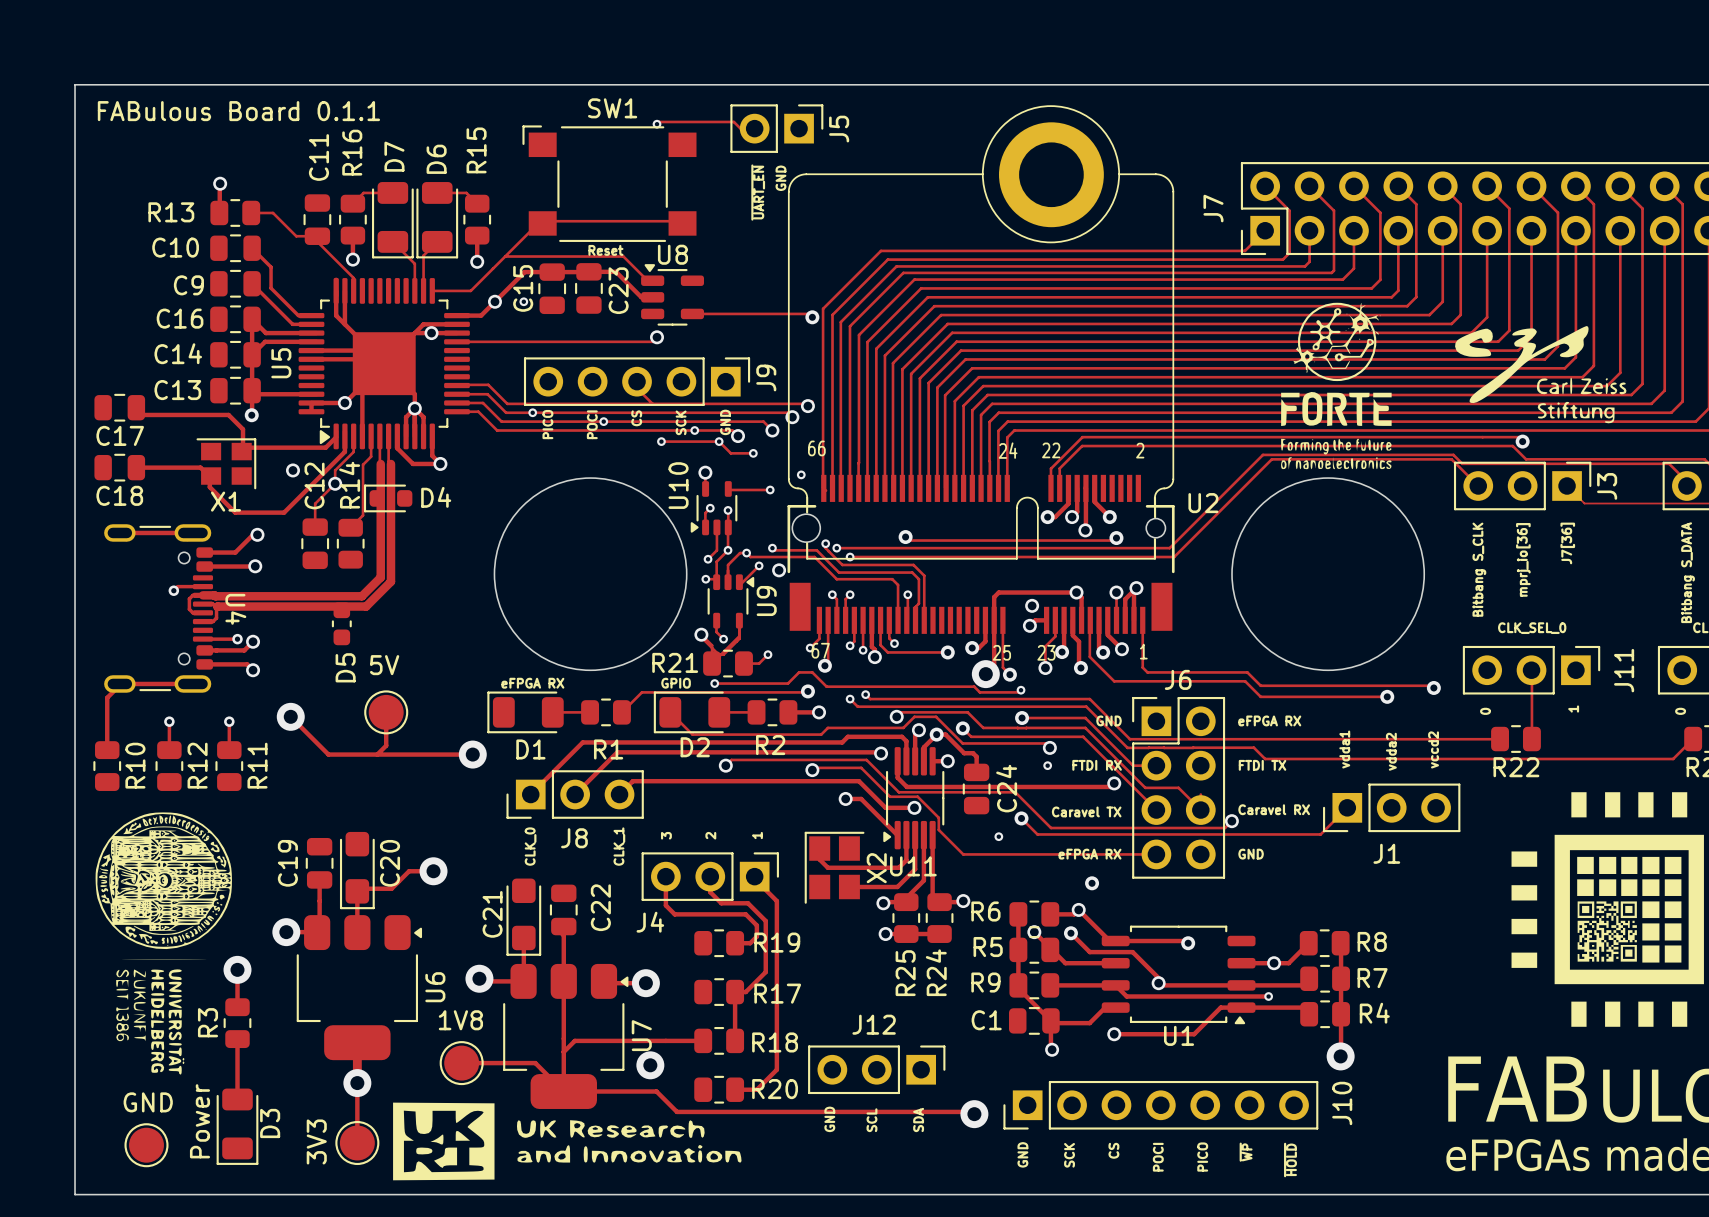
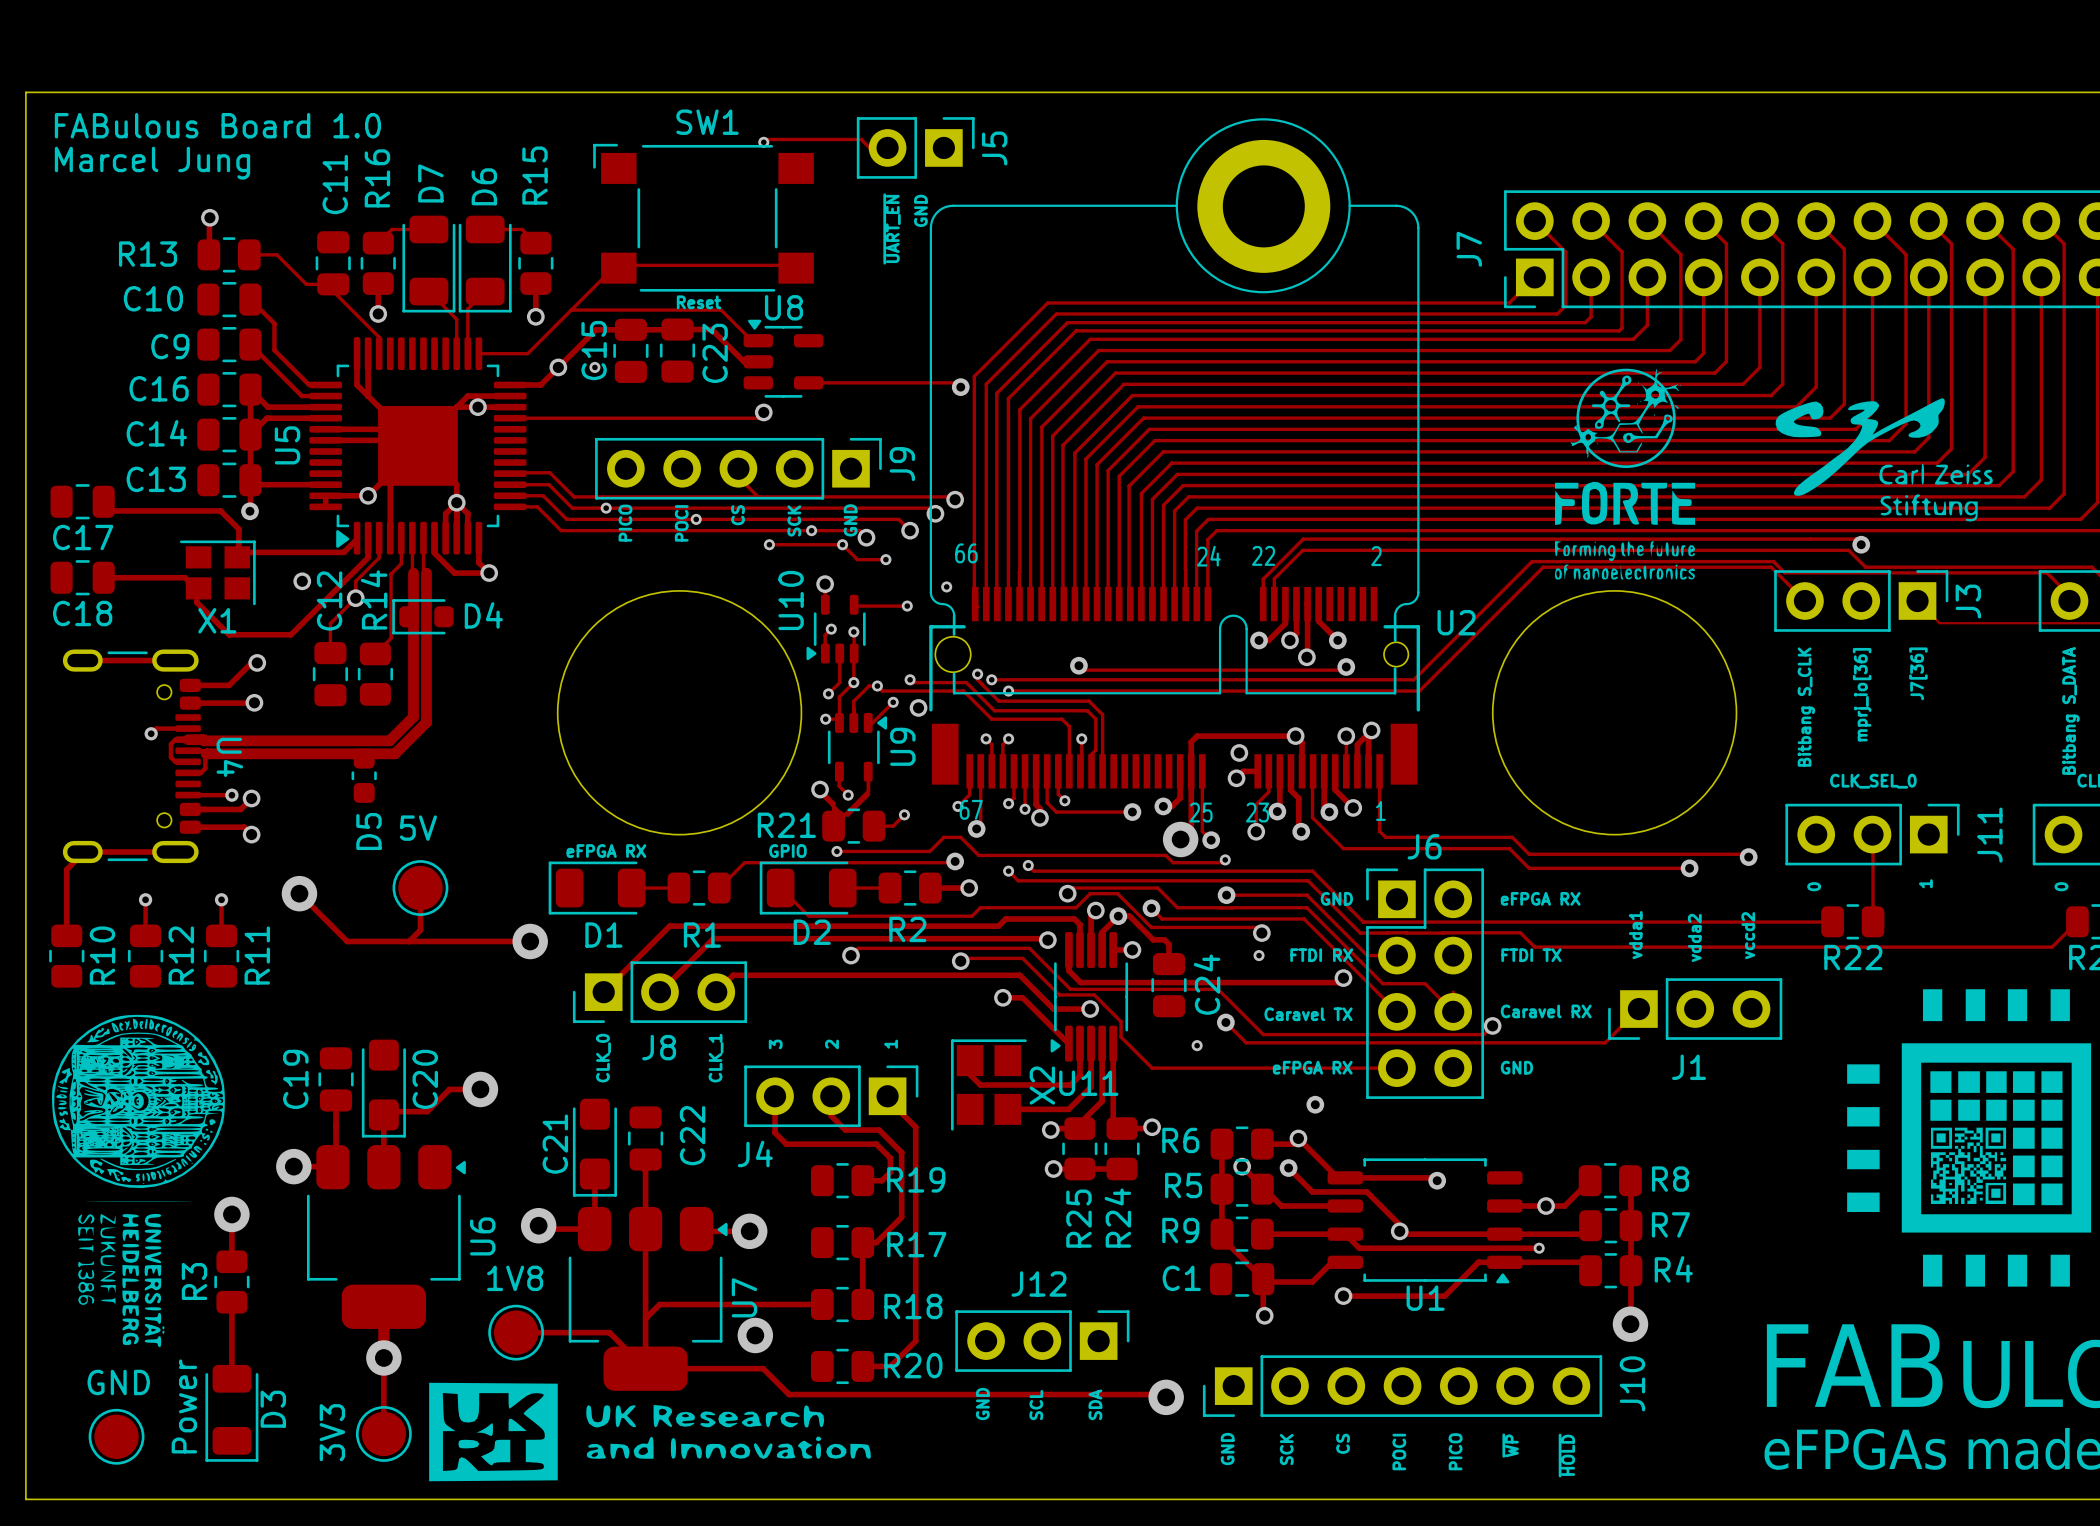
text: FABulous Board 0.1.1 (238, 111) -> FABulous Board 1.0 (217, 125)
text: none -> Marcel Jung (152, 163)

